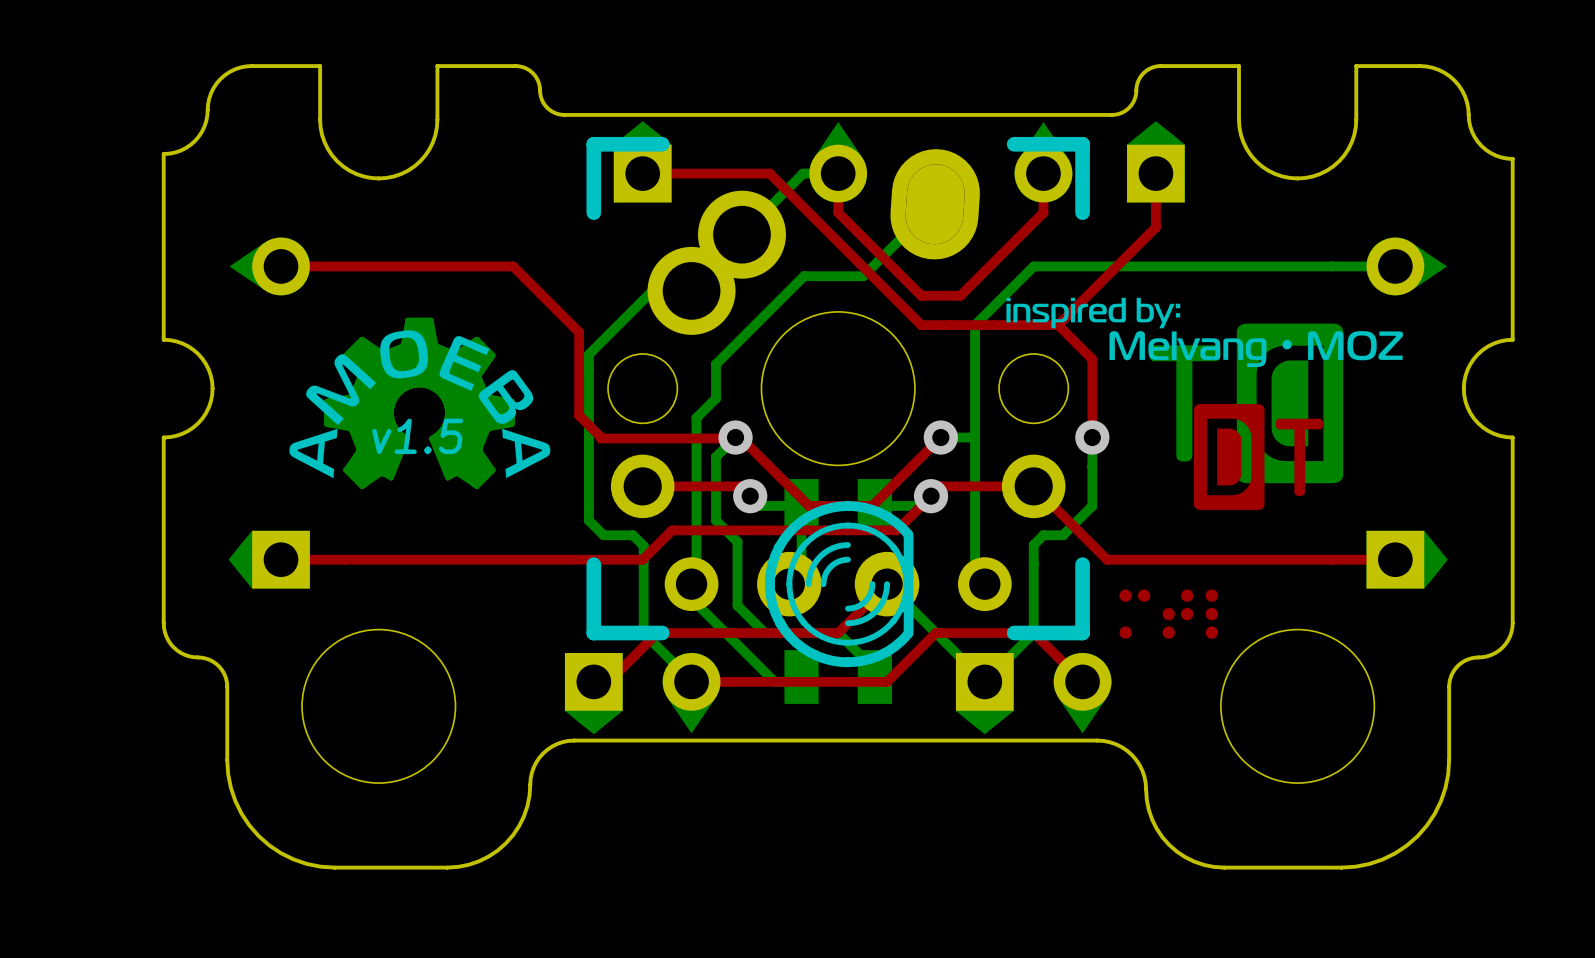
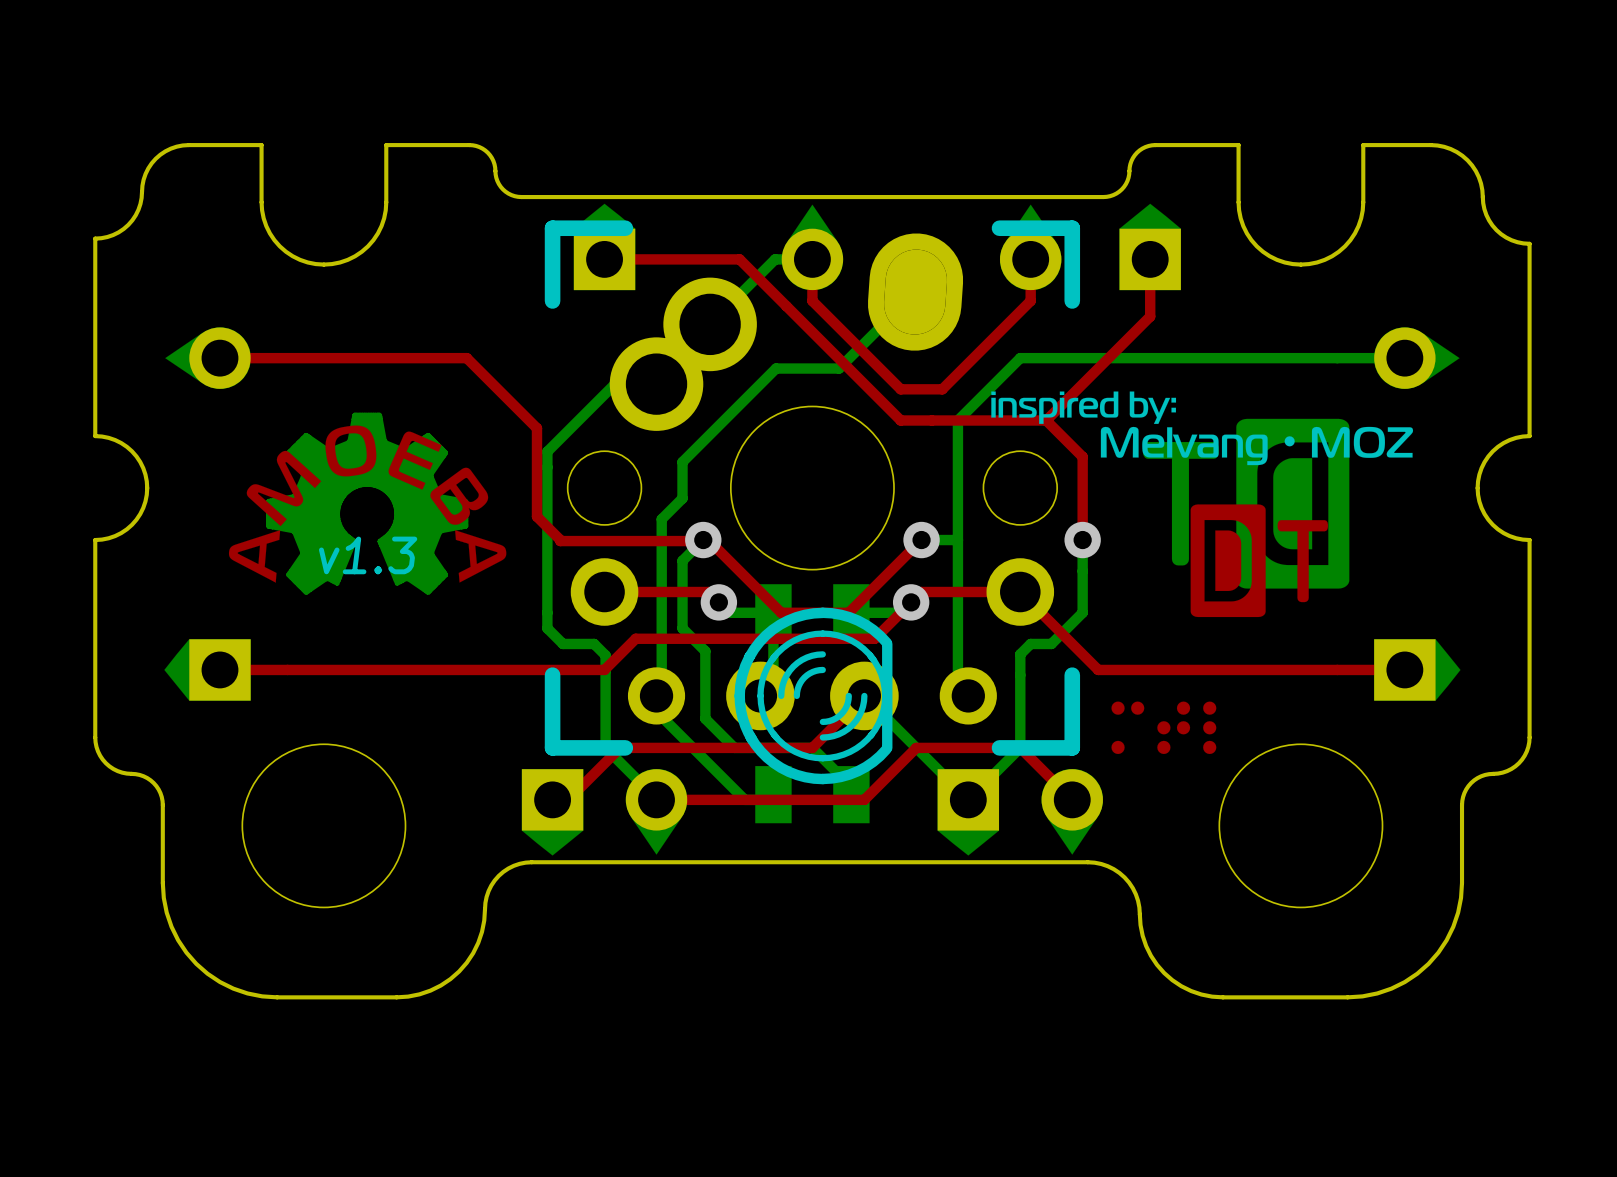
drawing shape: [289, 330, 551, 479] -> [228, 425, 507, 583]
text: v1.5 (417, 436) -> v1.3 (368, 555)

